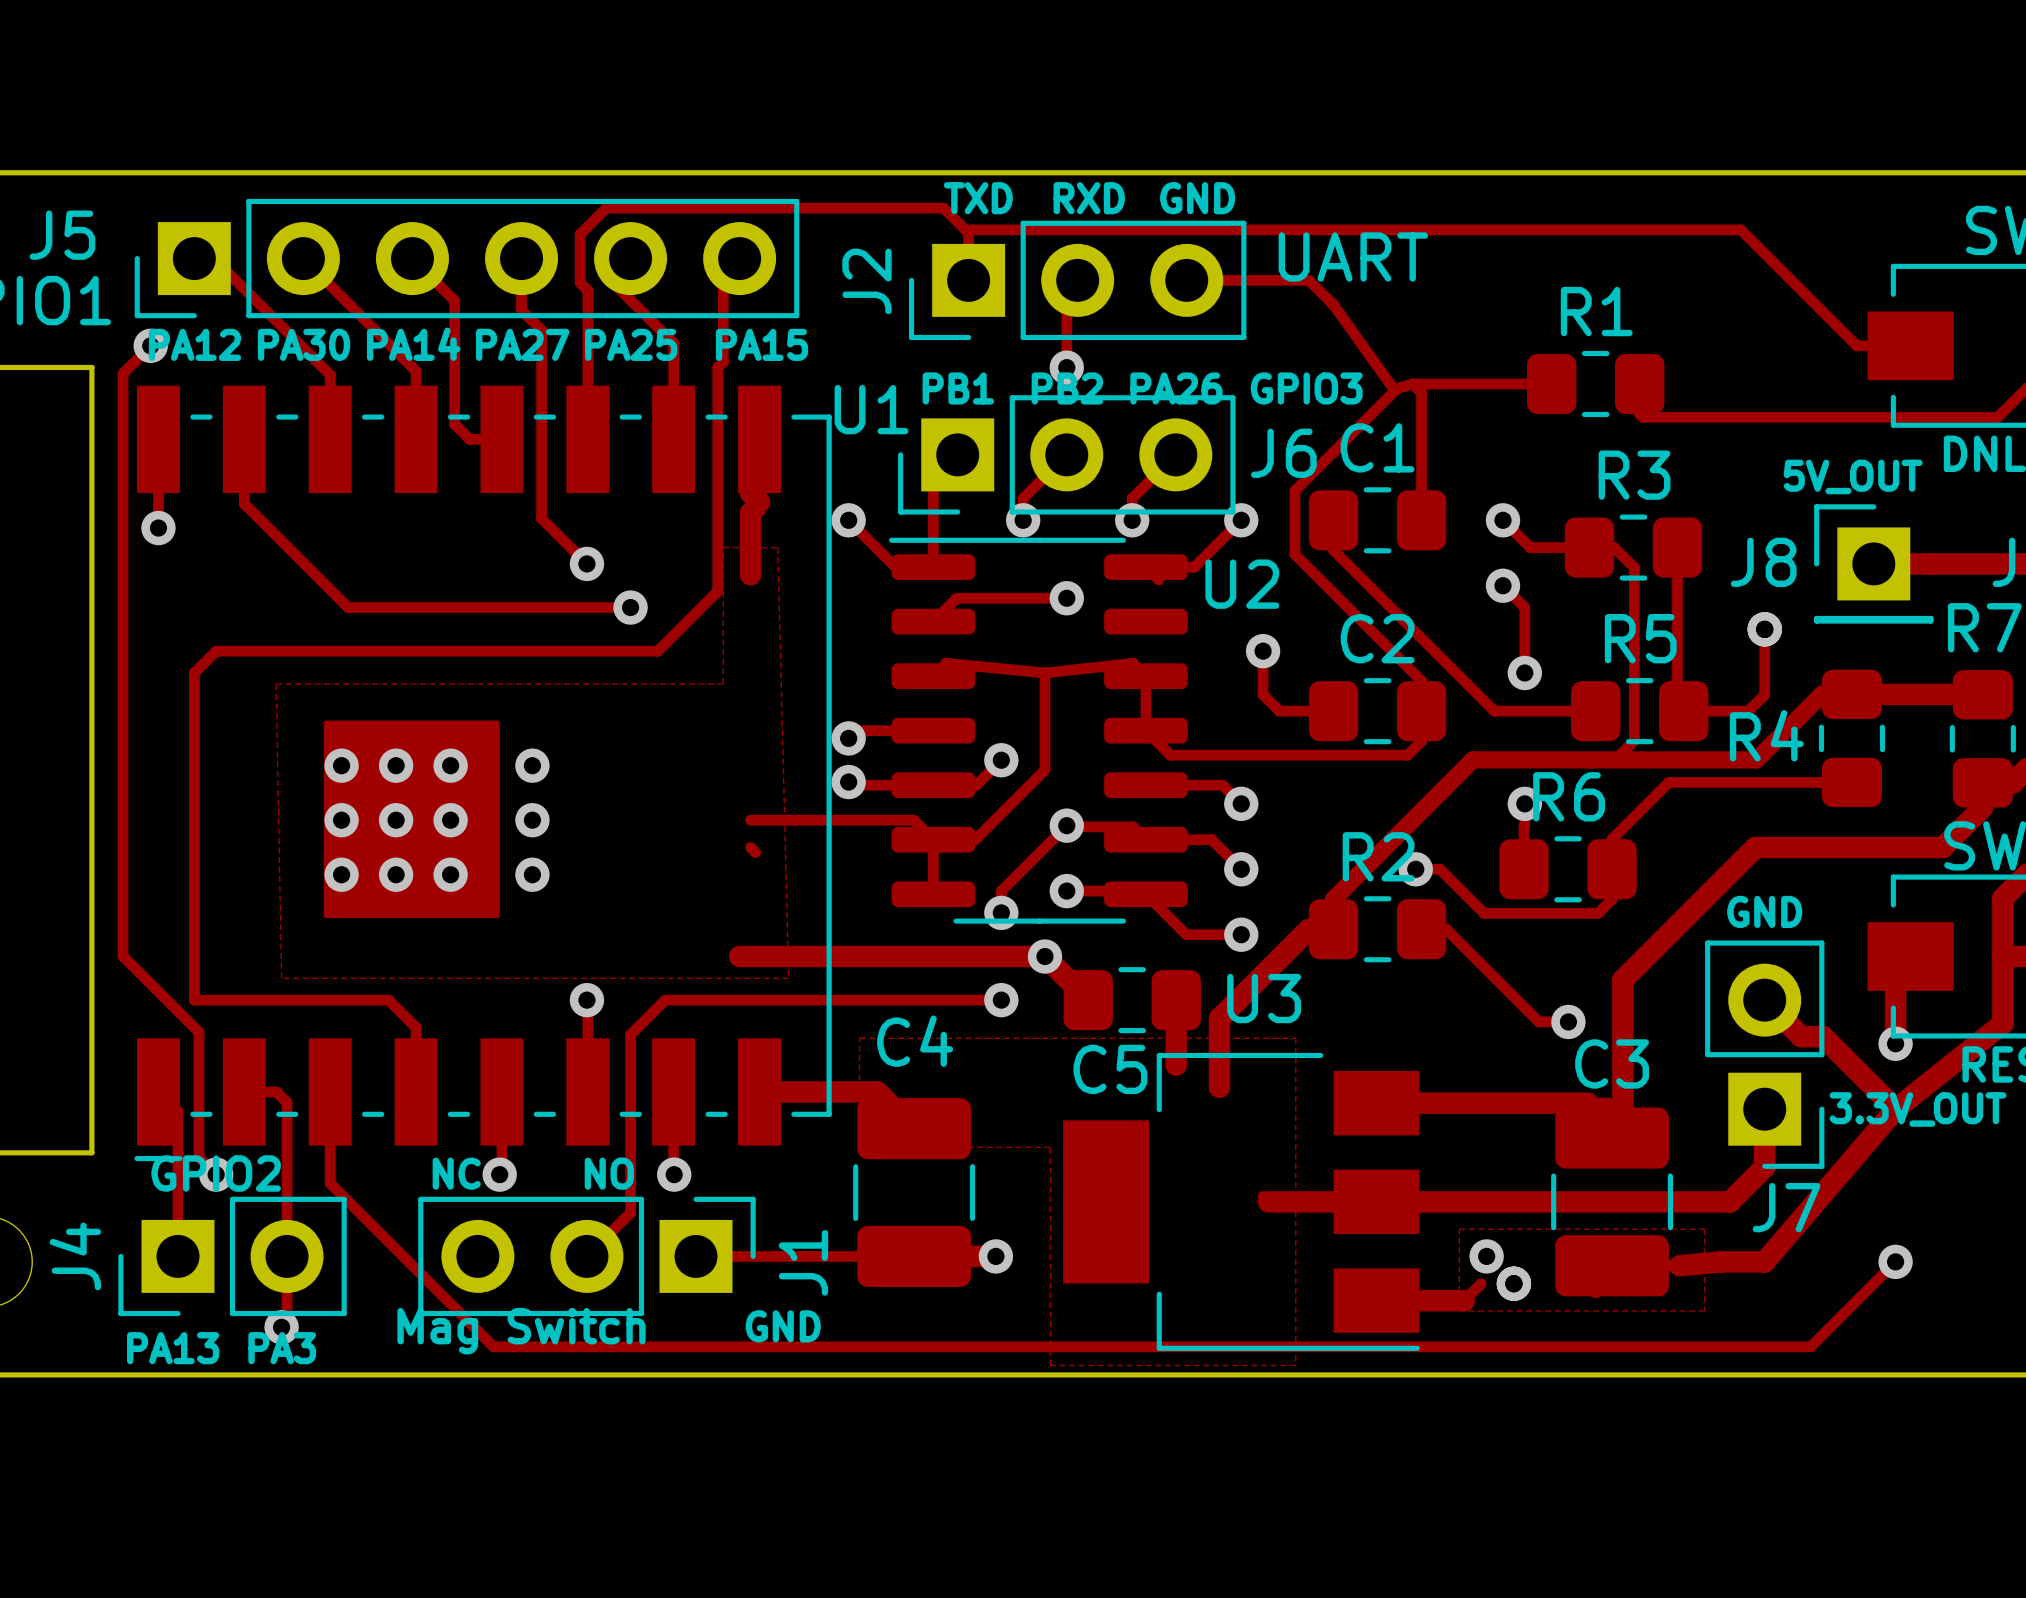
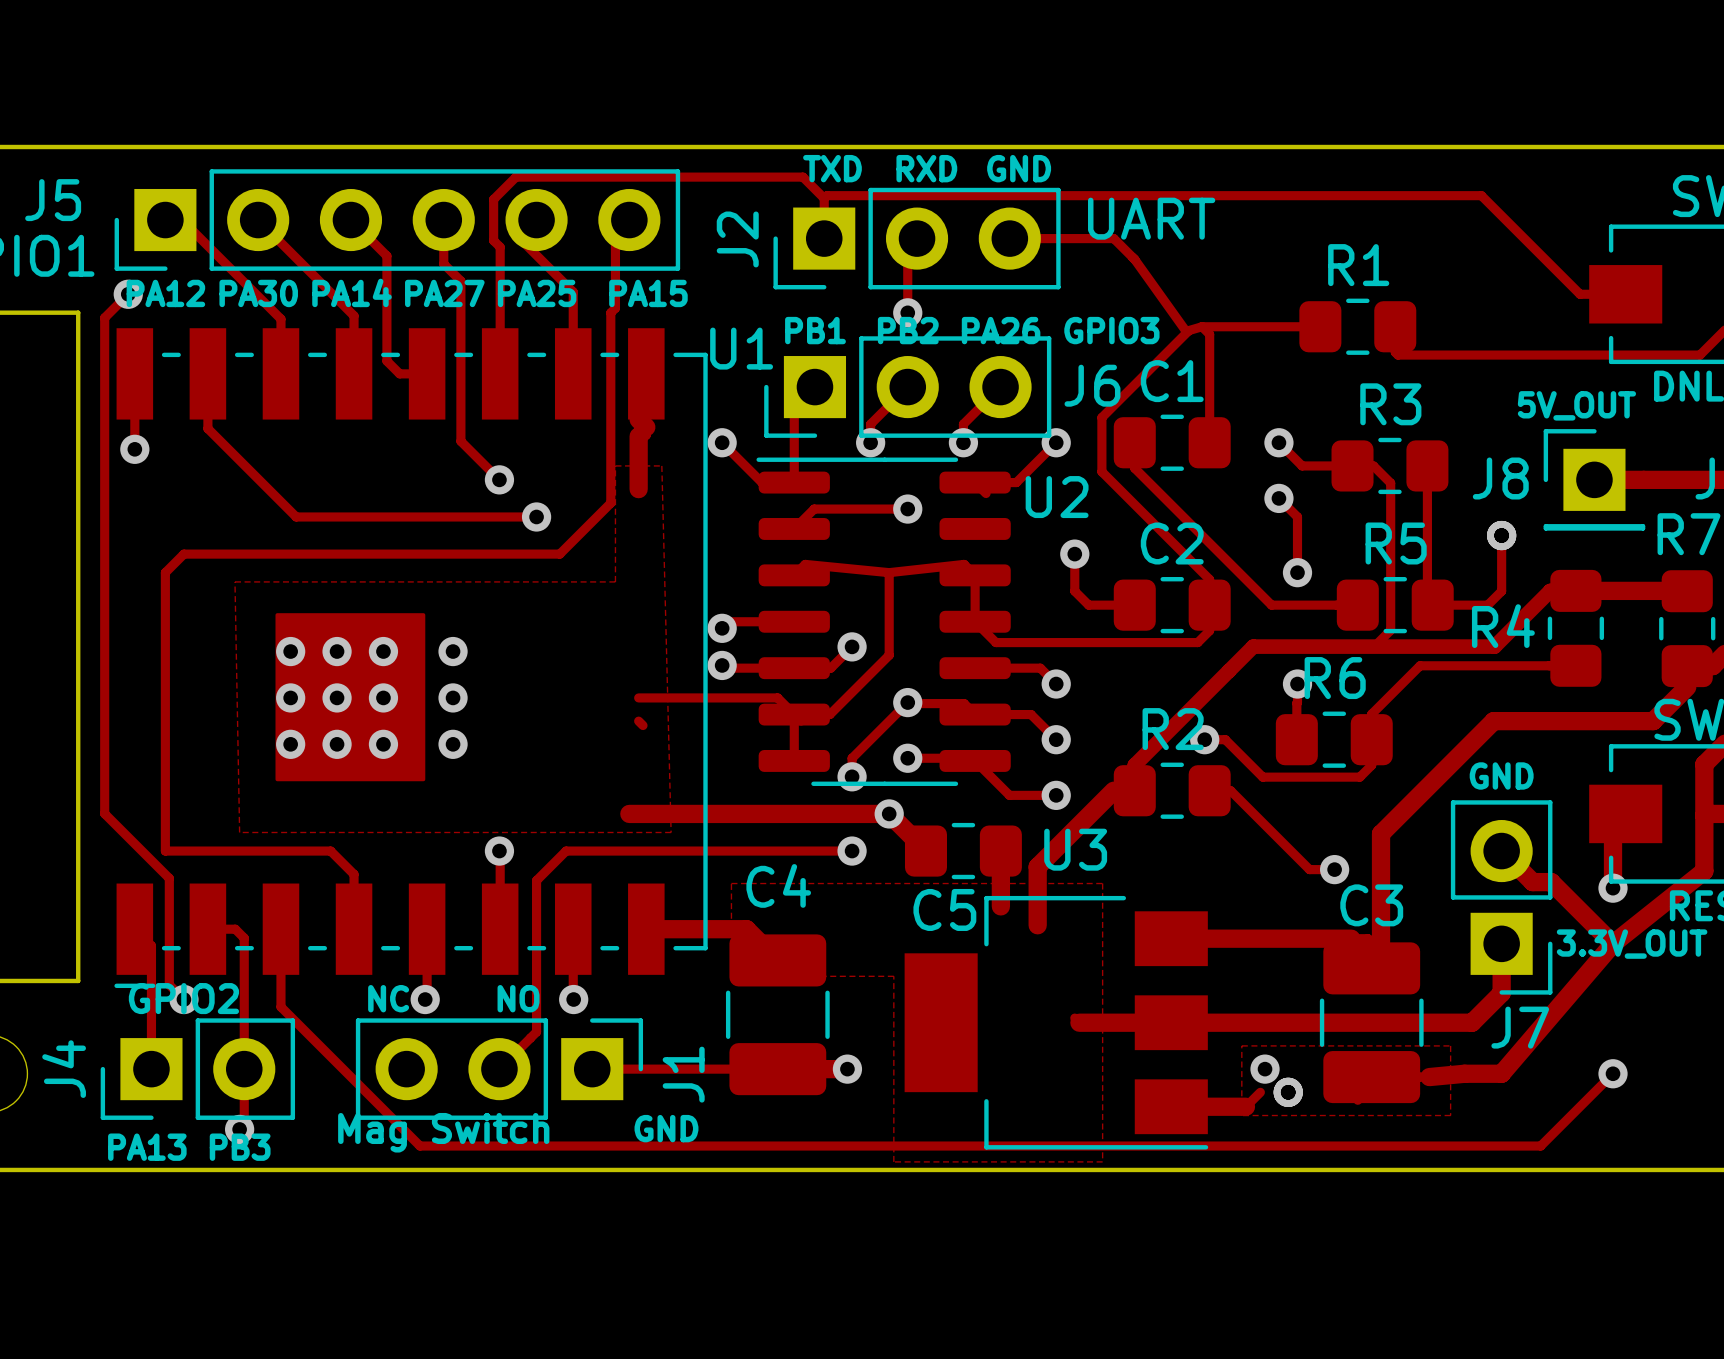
text: PA3 (282, 1348) -> PB3 (240, 1147)

